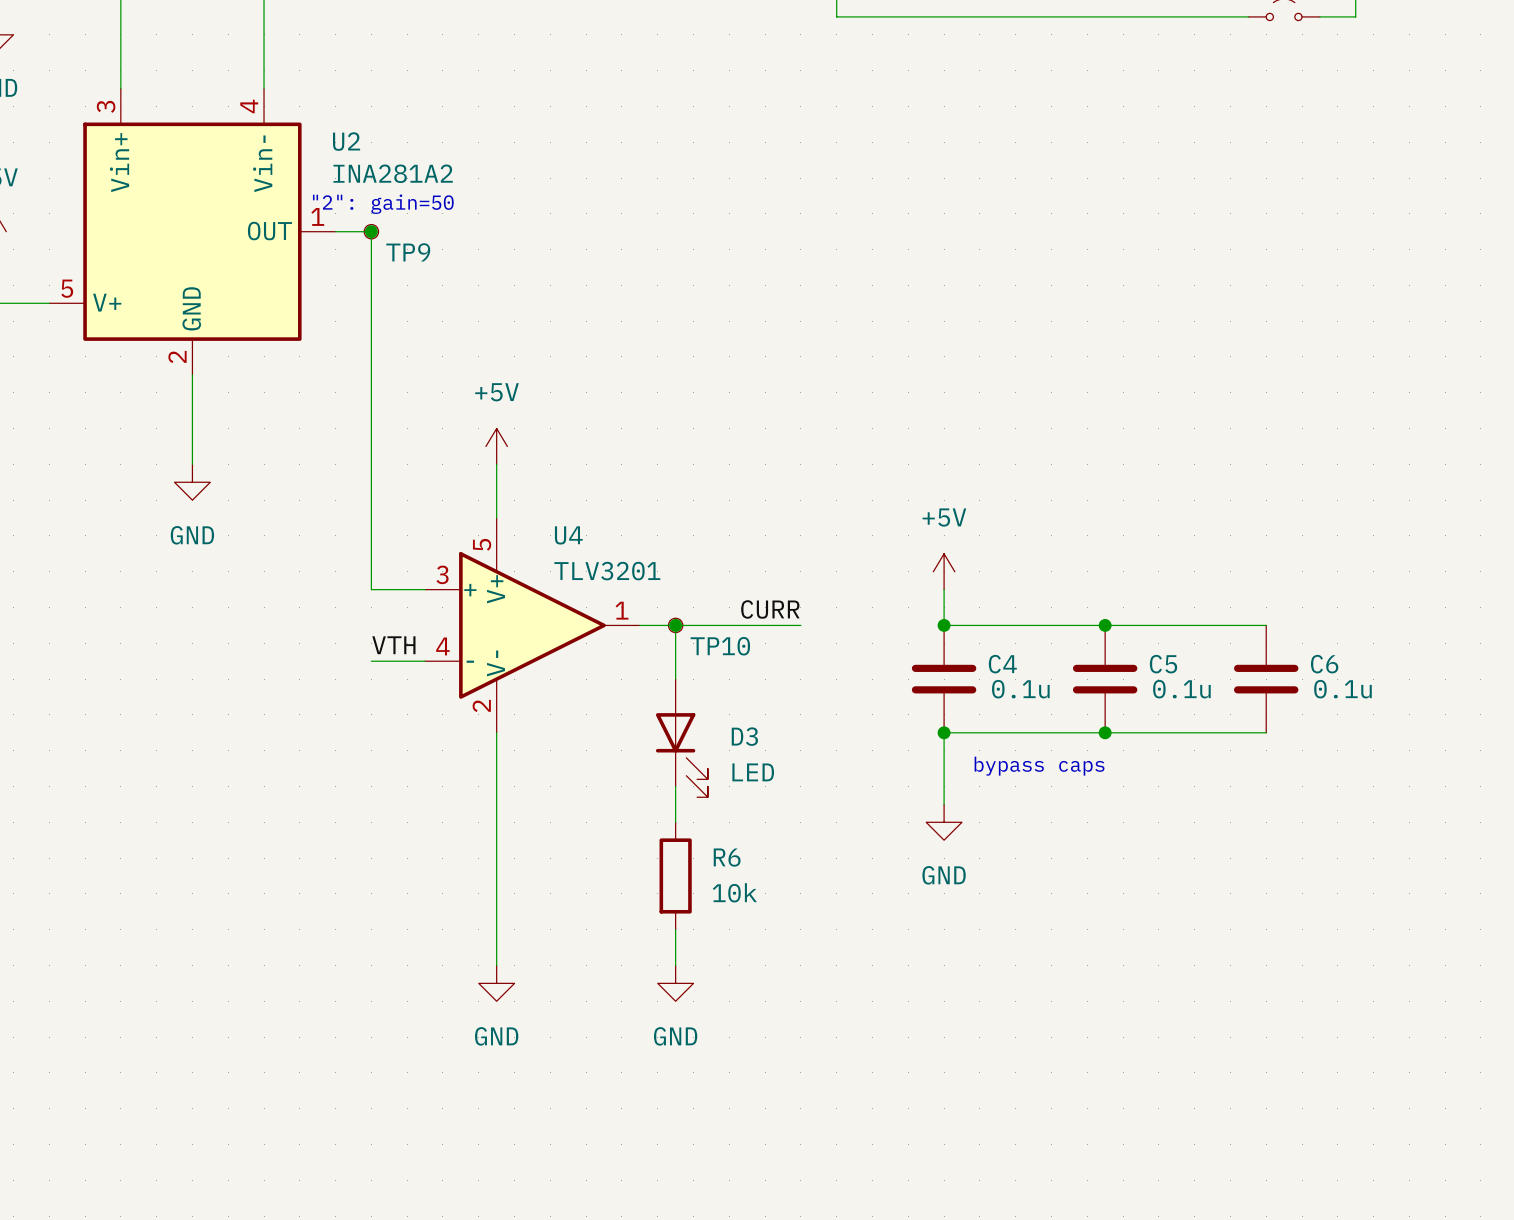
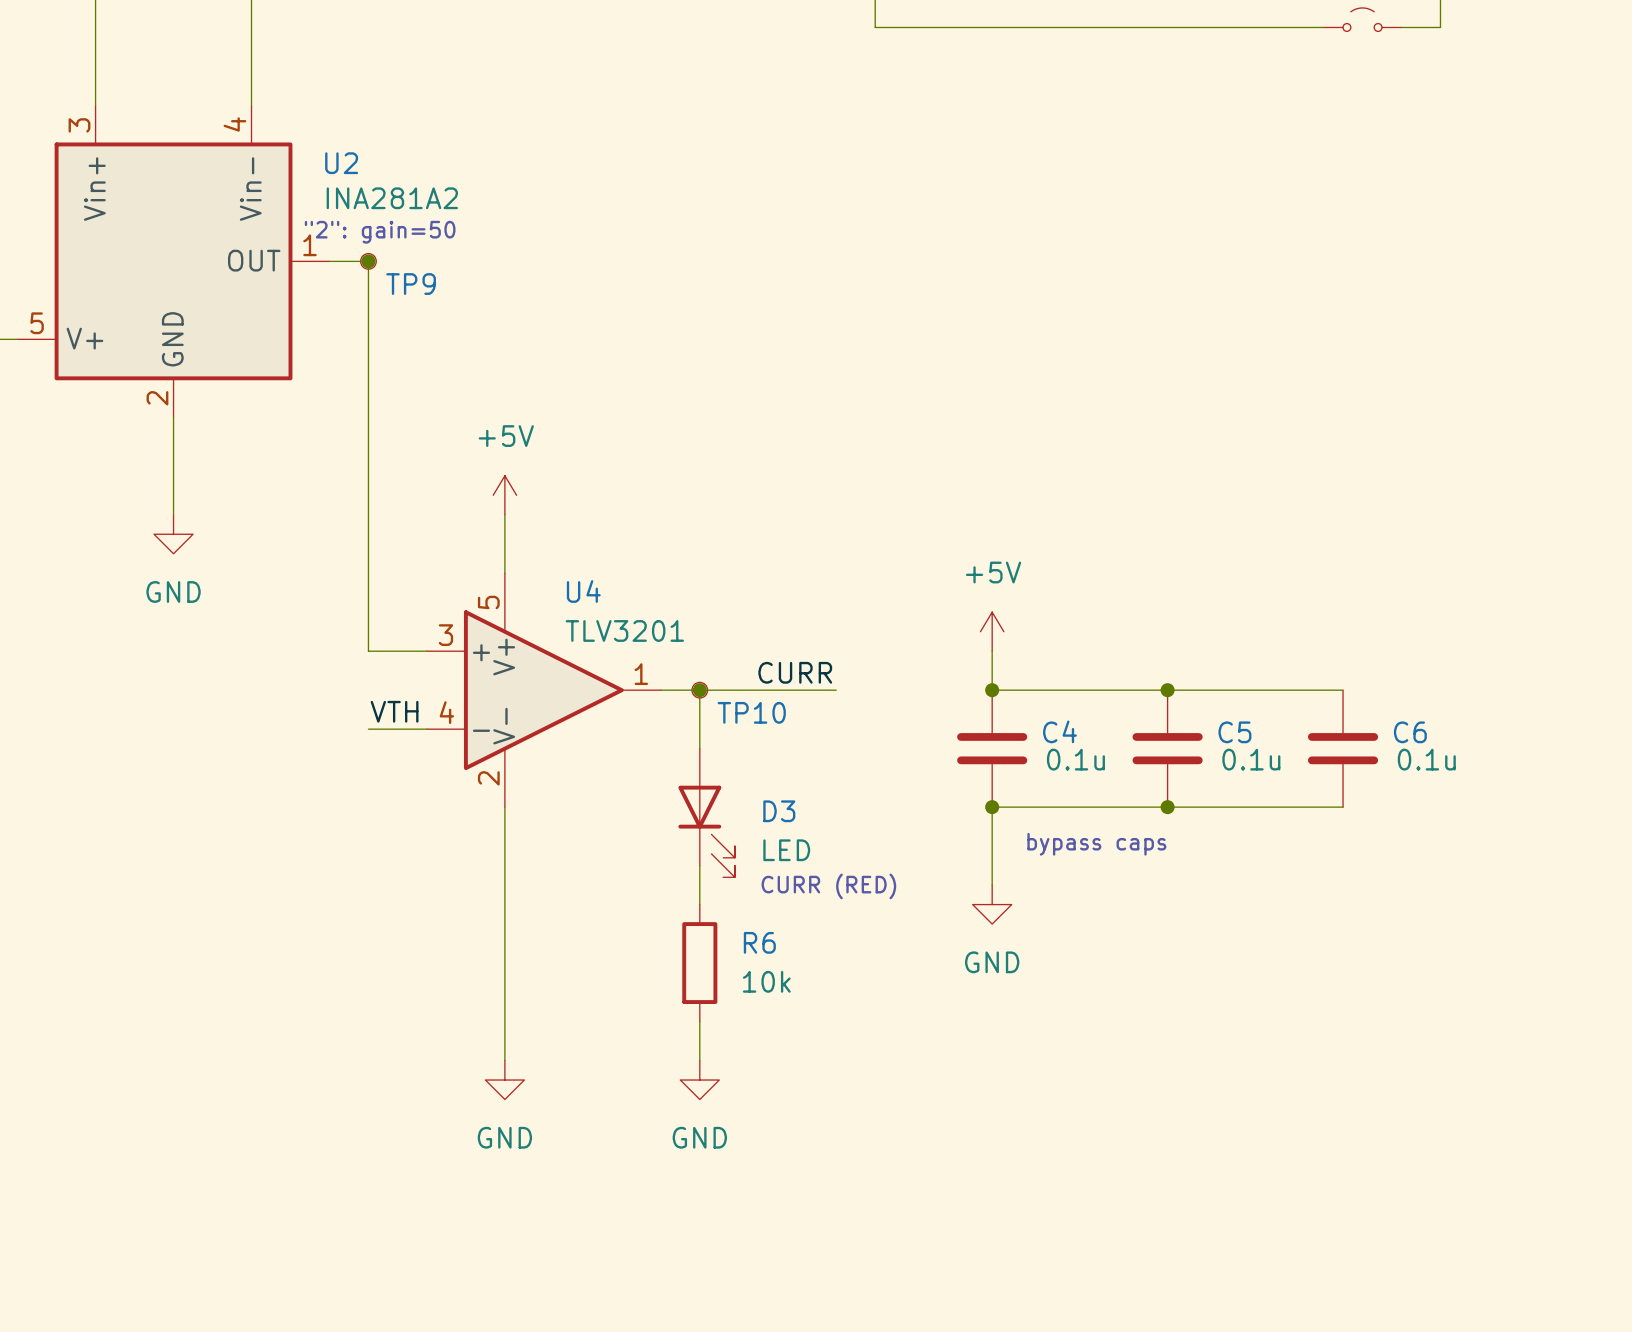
text: none -> CURR (RED) (828, 886)

